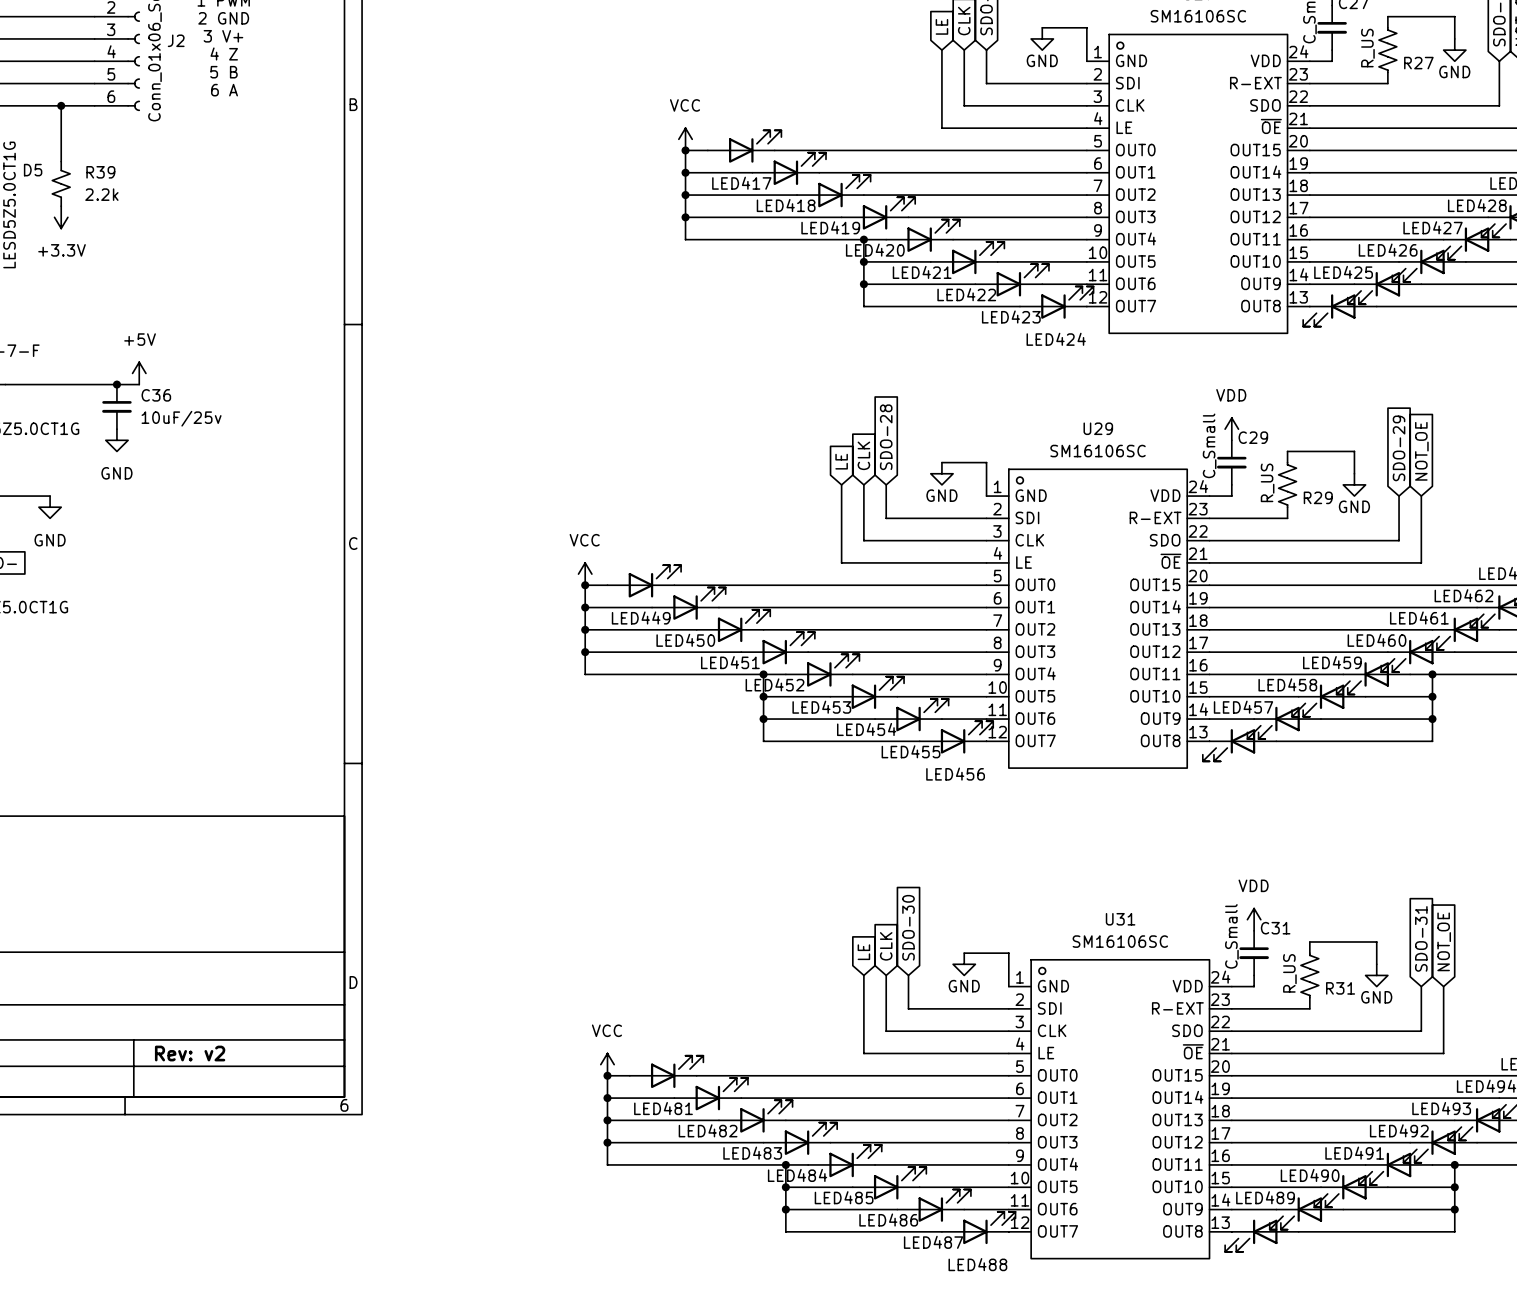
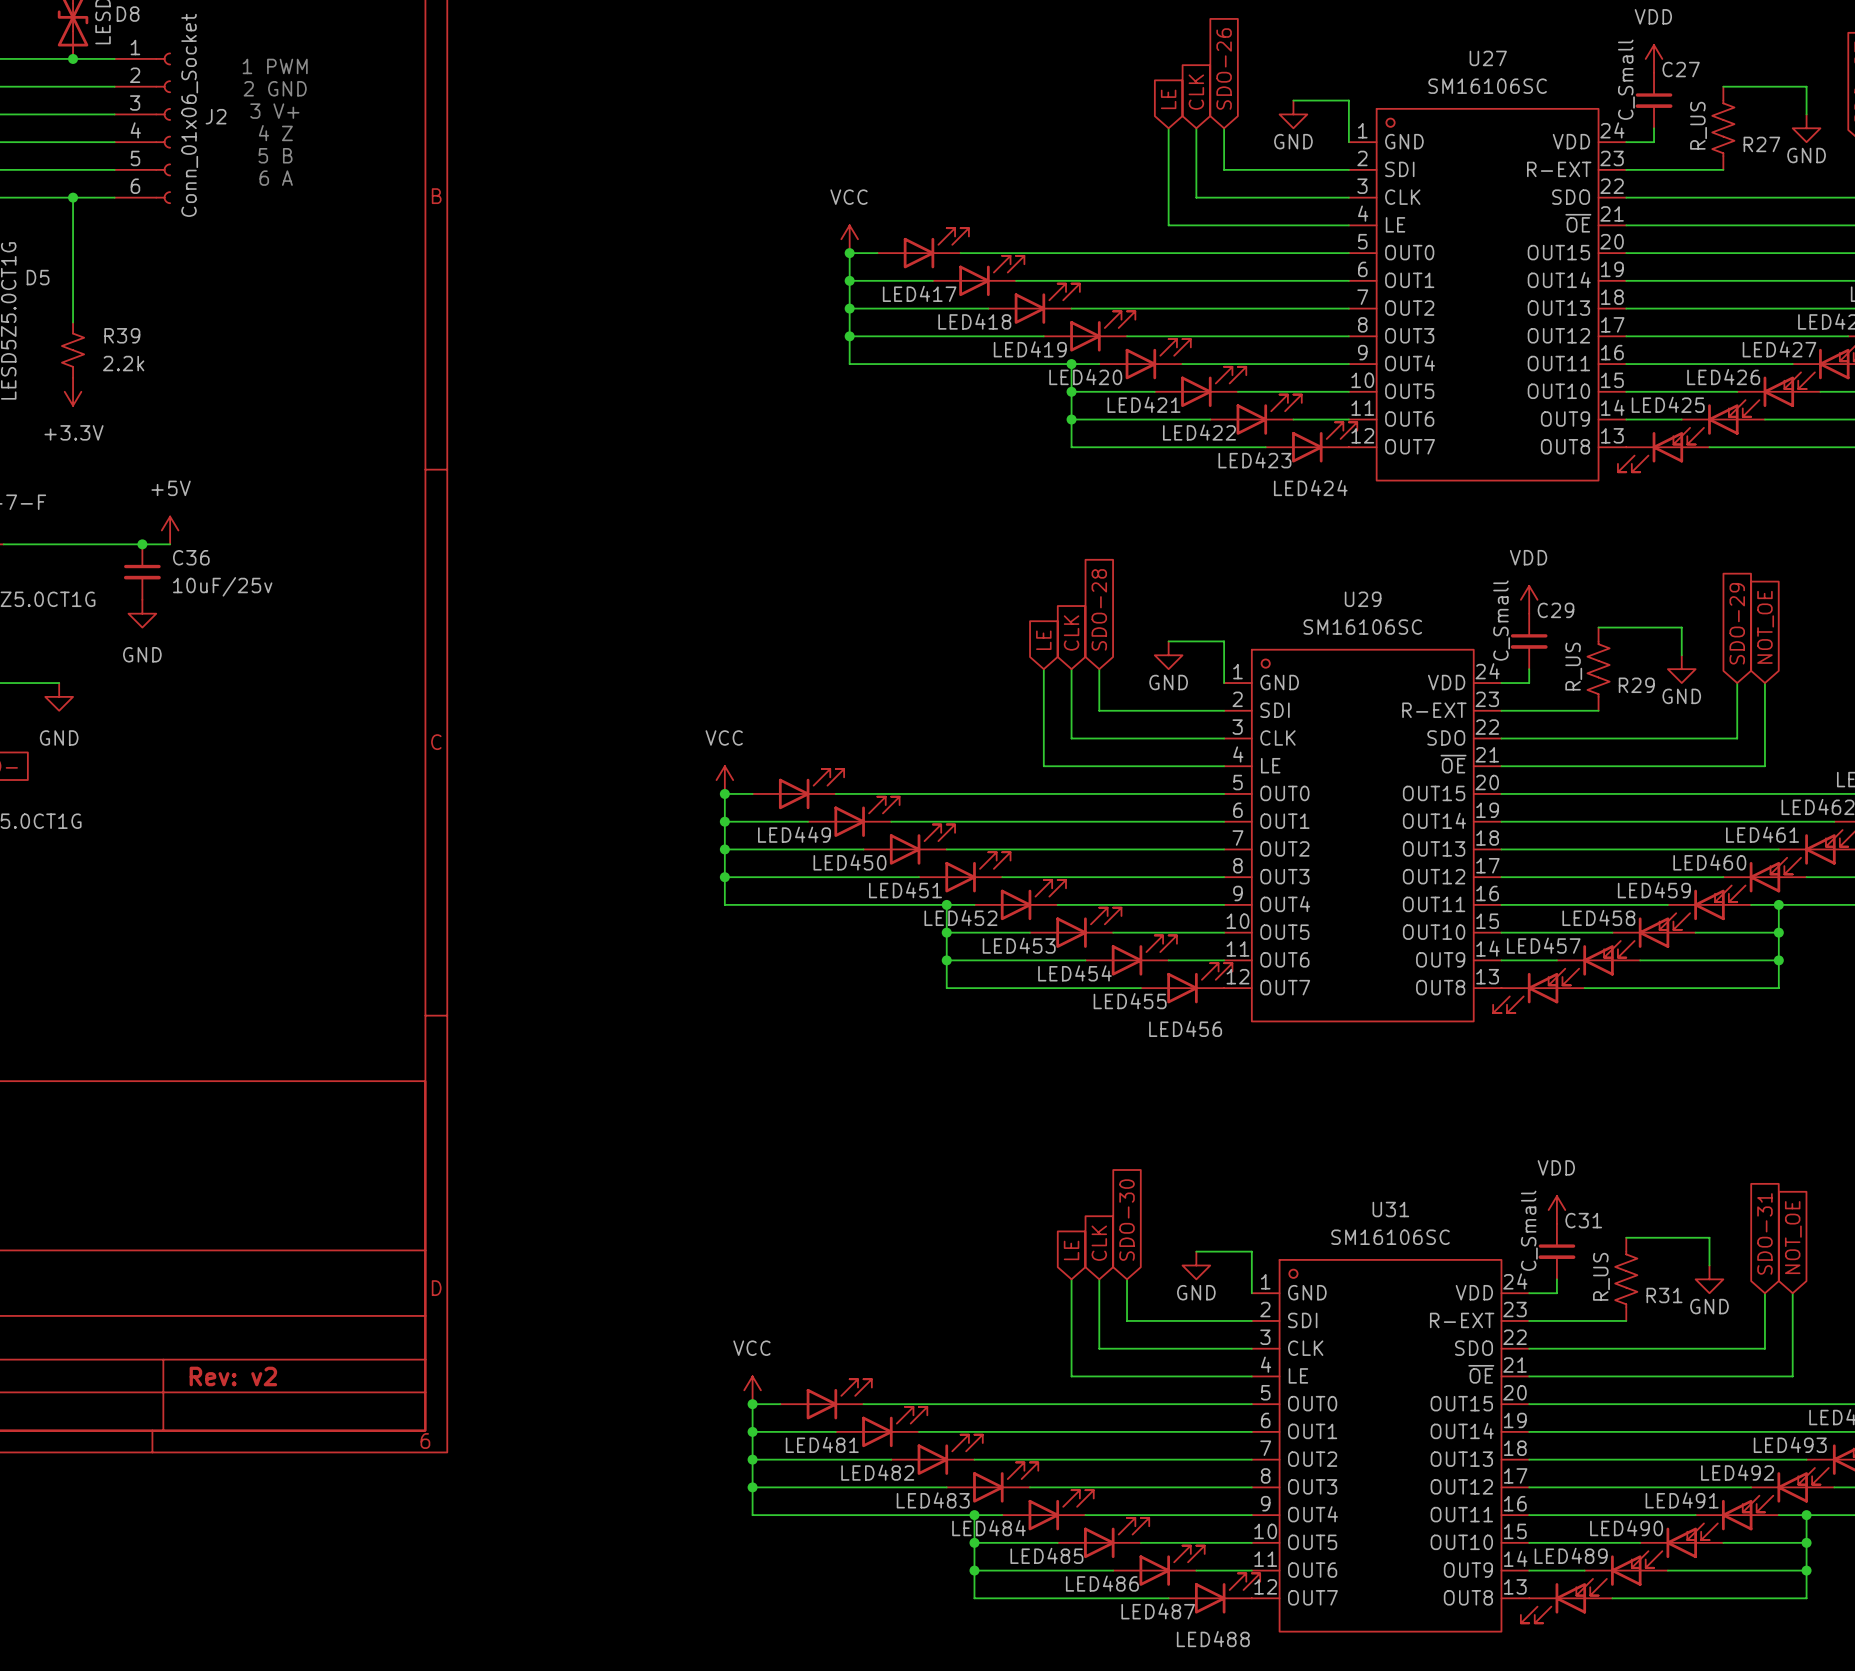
R39 position: (61, 183) -> (73, 350)
power symbol position: +3.3V (61, 217) -> +3.3V (73, 391)

